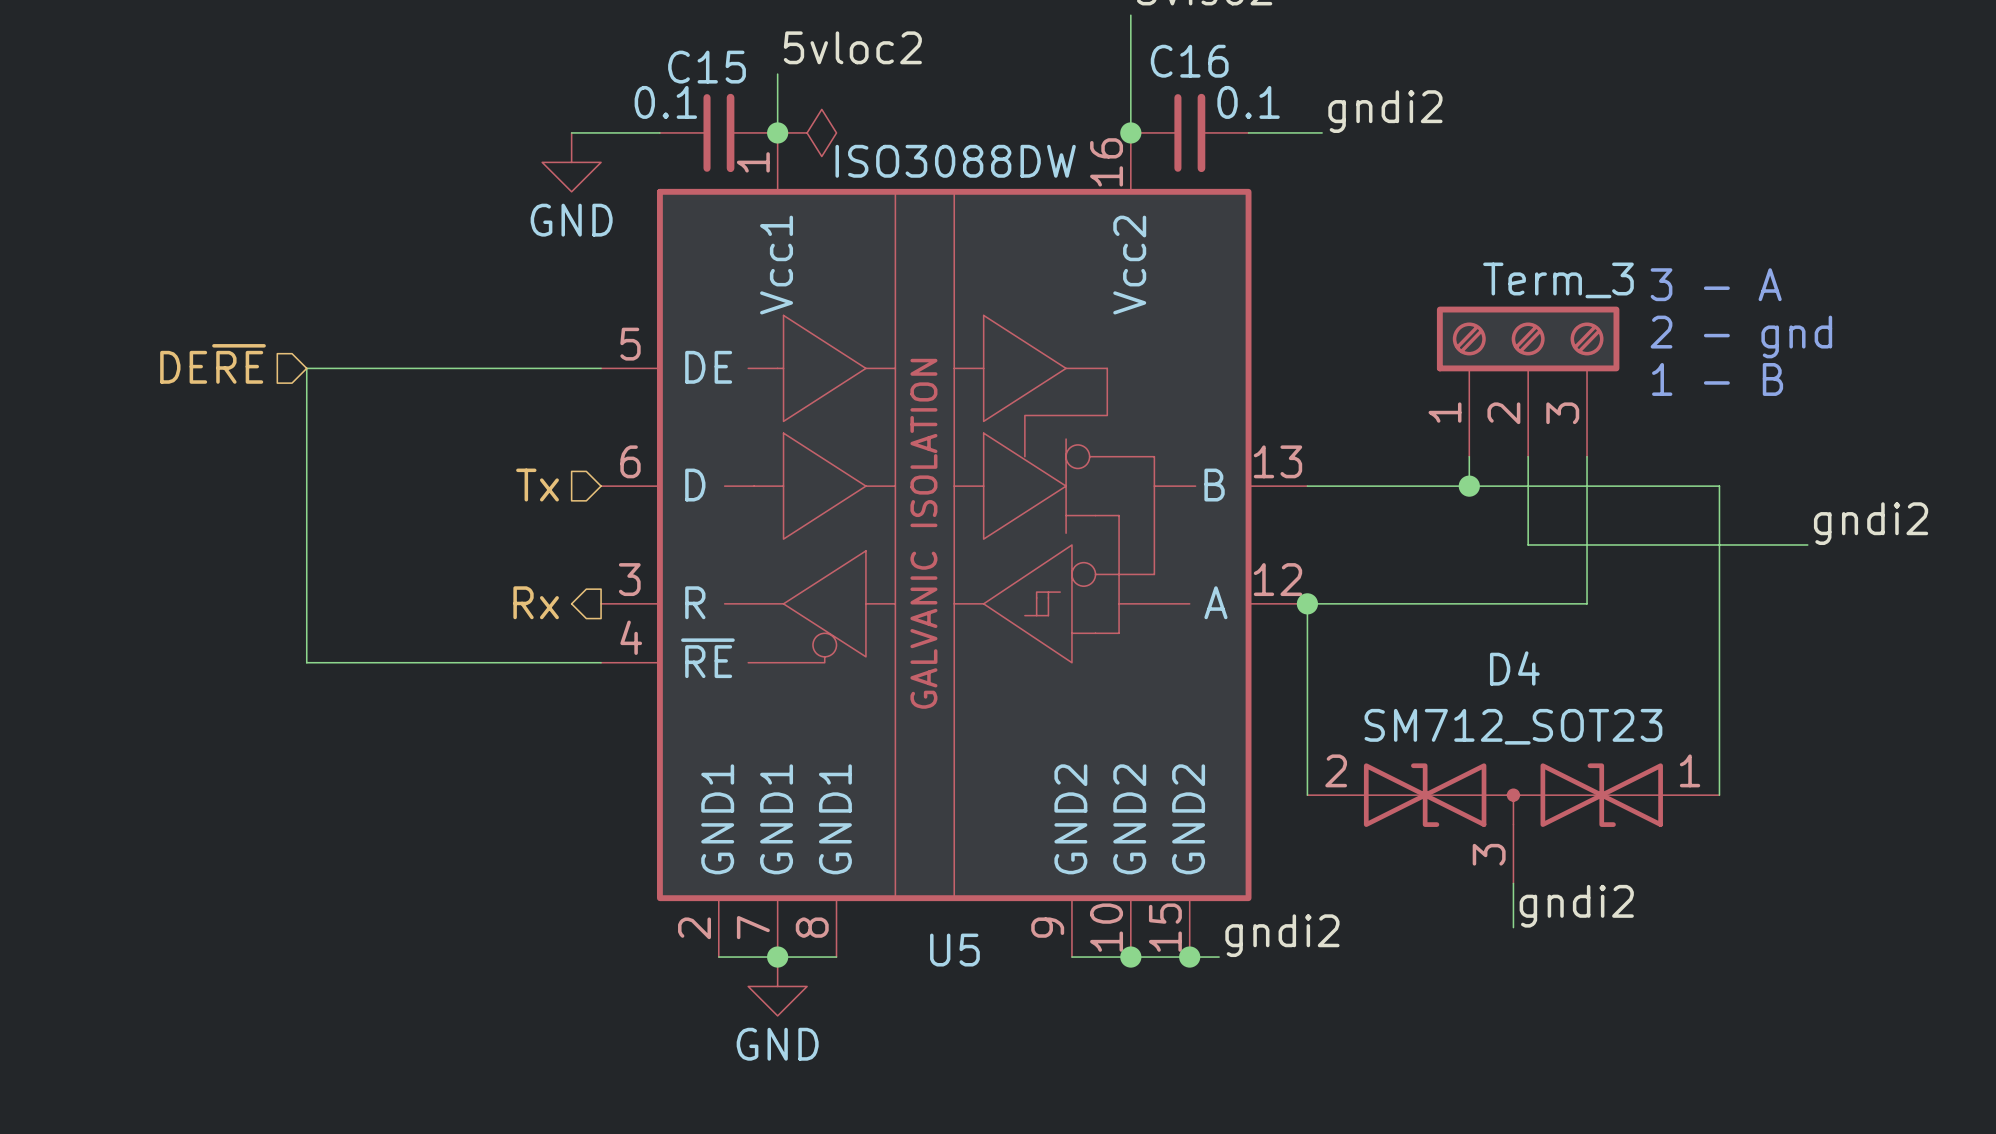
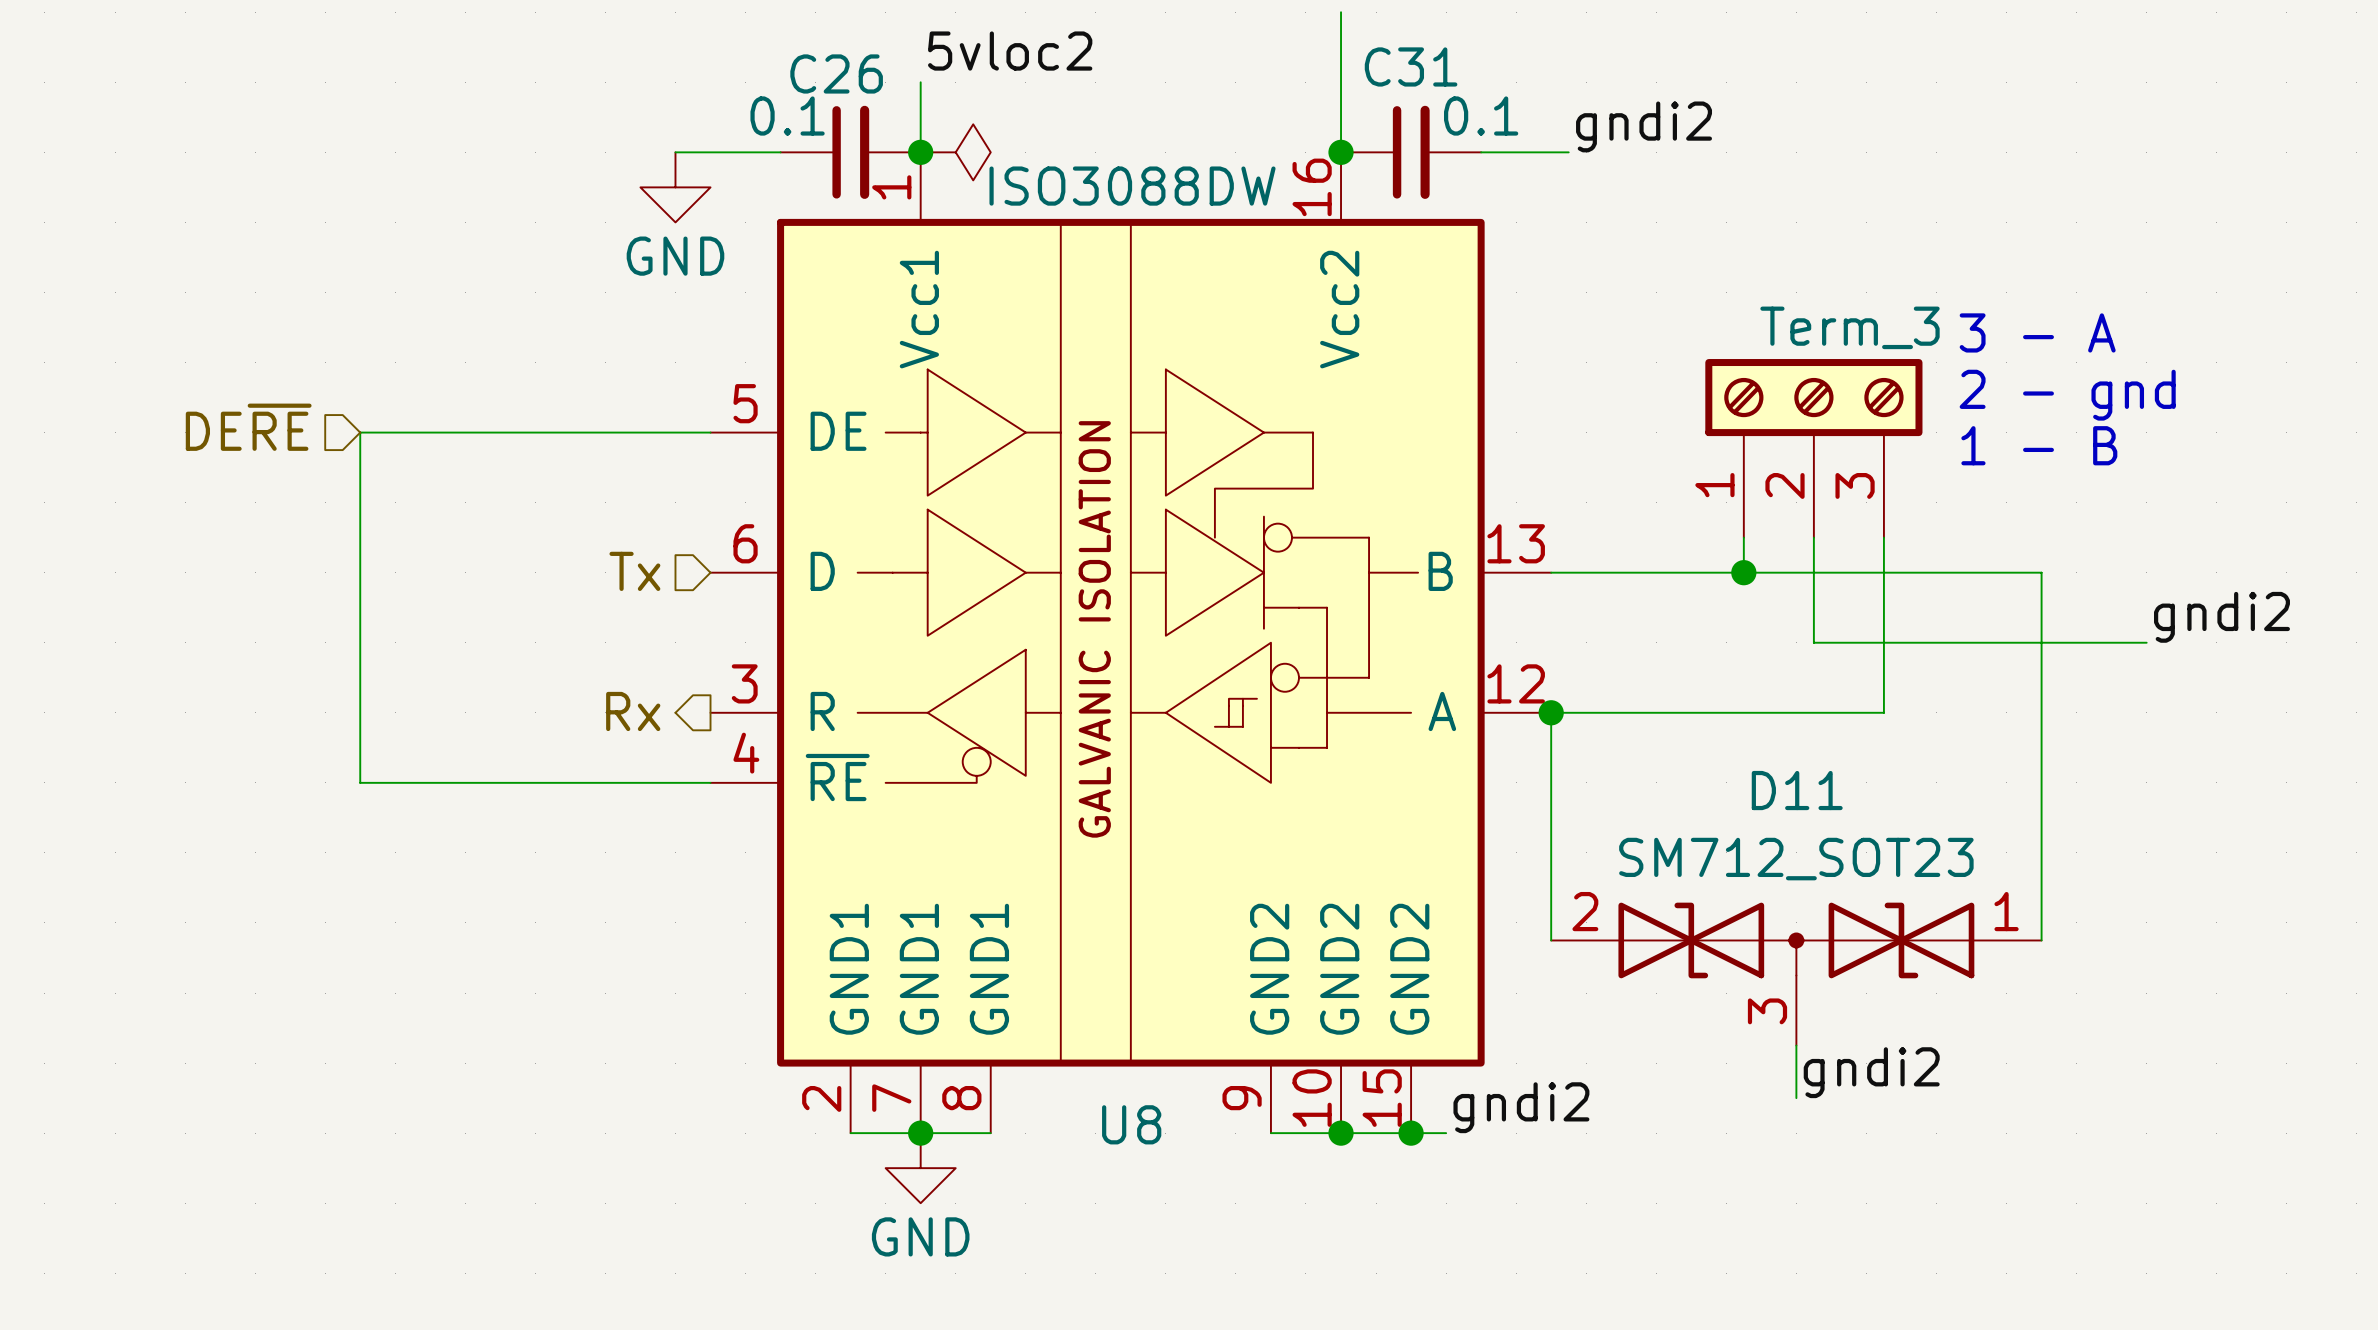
C16 name: C16 (1189, 61) -> C31 (1411, 66)
C15 name: C15 (707, 67) -> C26 (836, 73)
D4 name: D4 (1514, 668) -> D11 (1797, 790)
U5 name: U5 (954, 950) -> U8 (1131, 1124)

